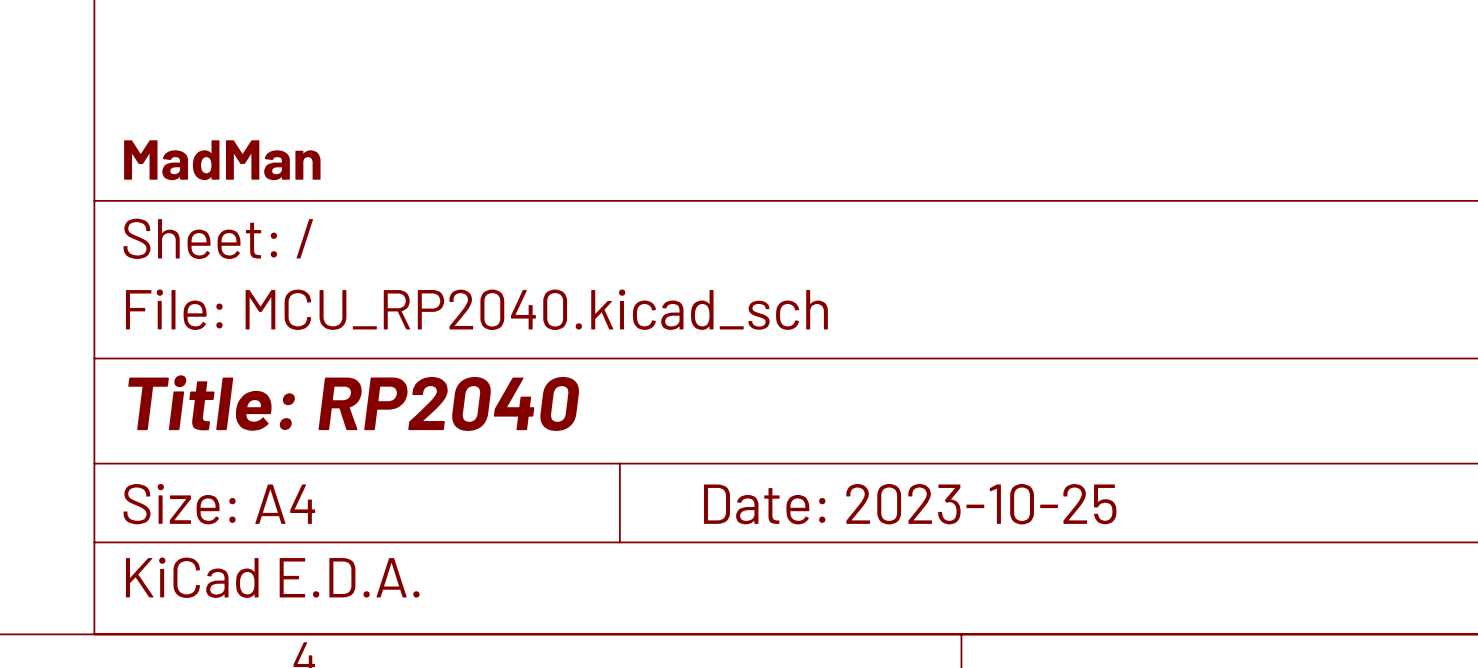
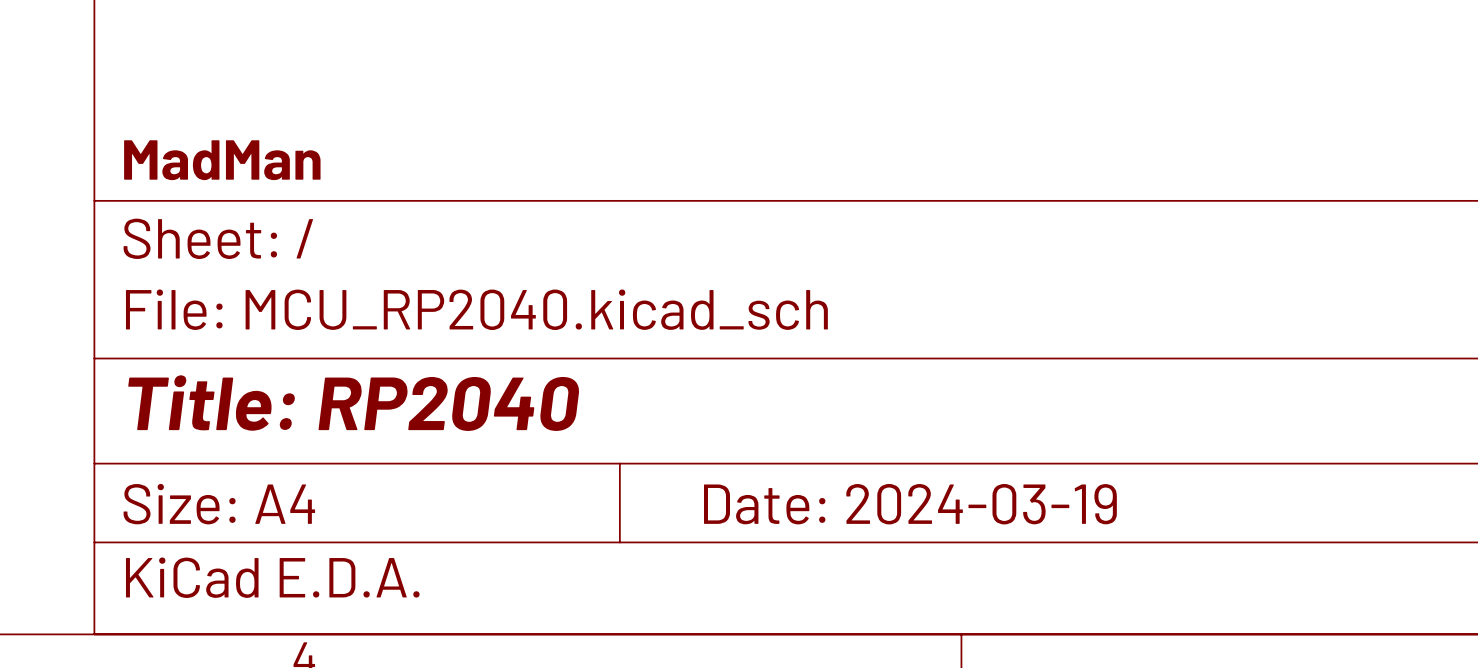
title block: Date: 2023-10-25 (910, 504) -> Date: 2024-03-19 (910, 504)

